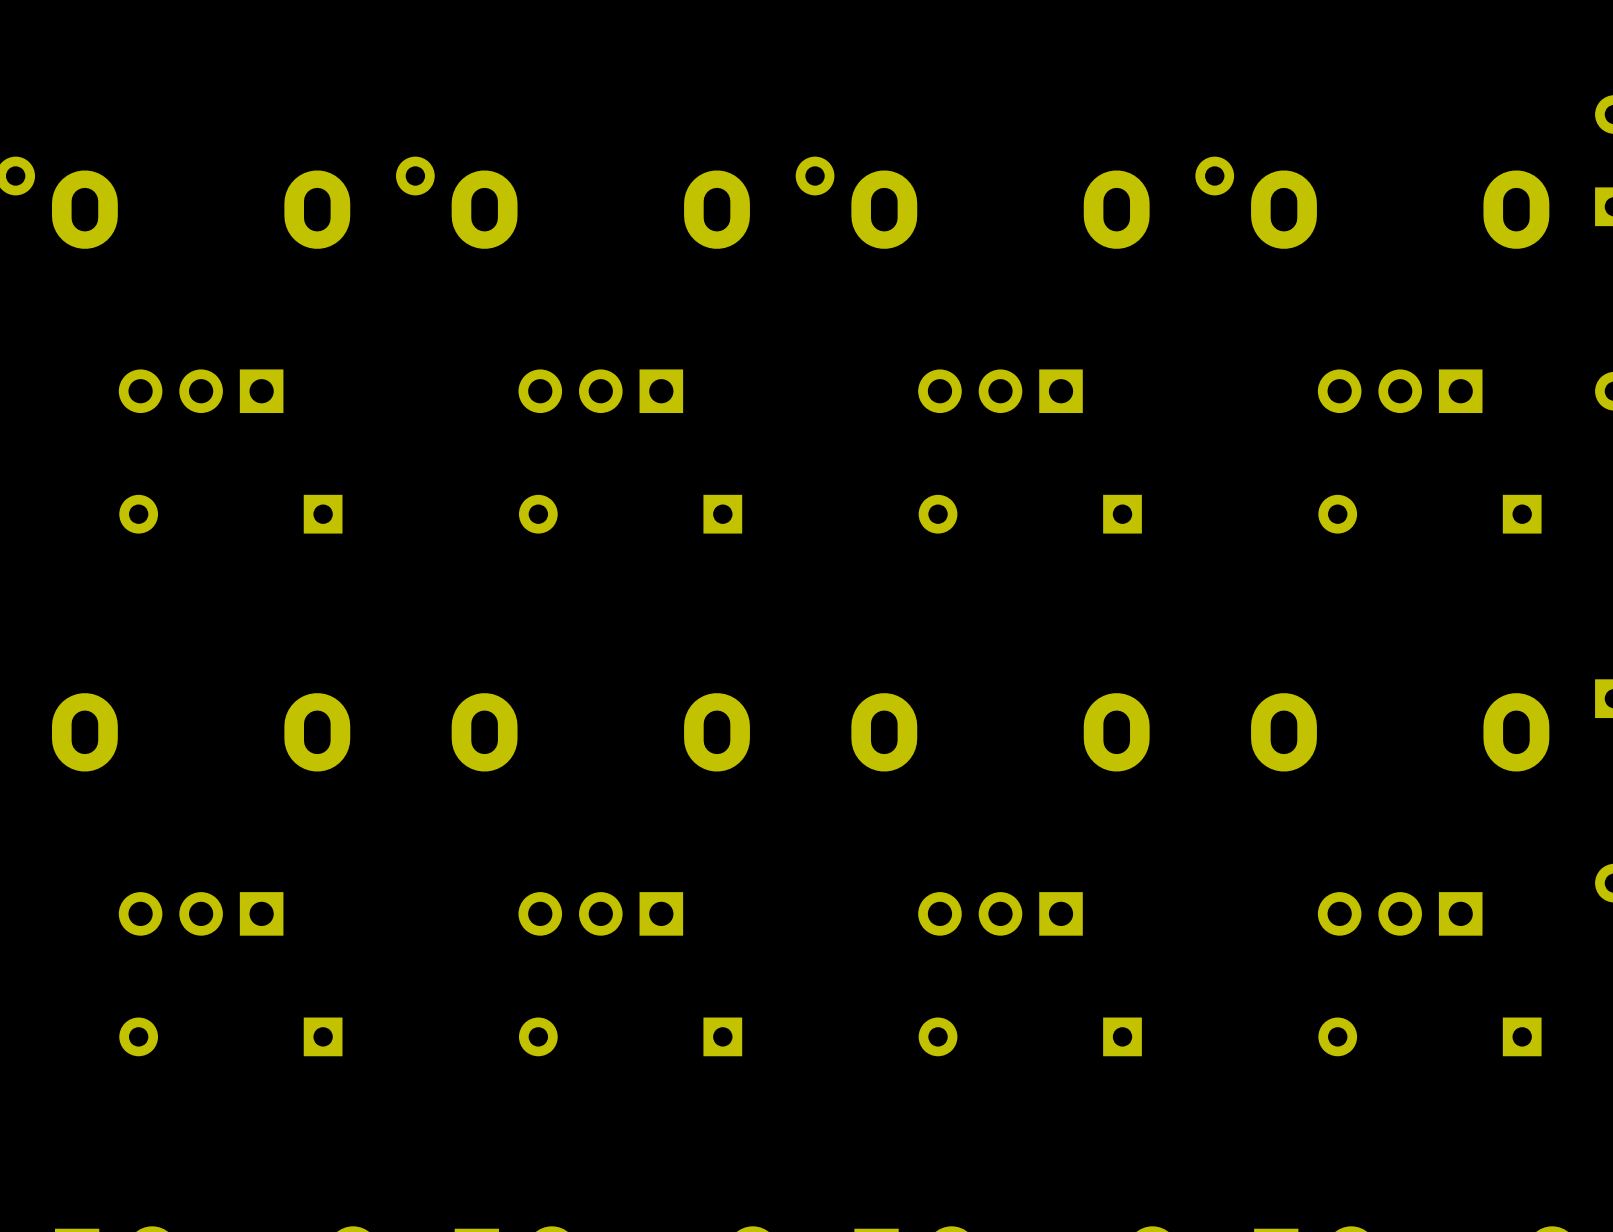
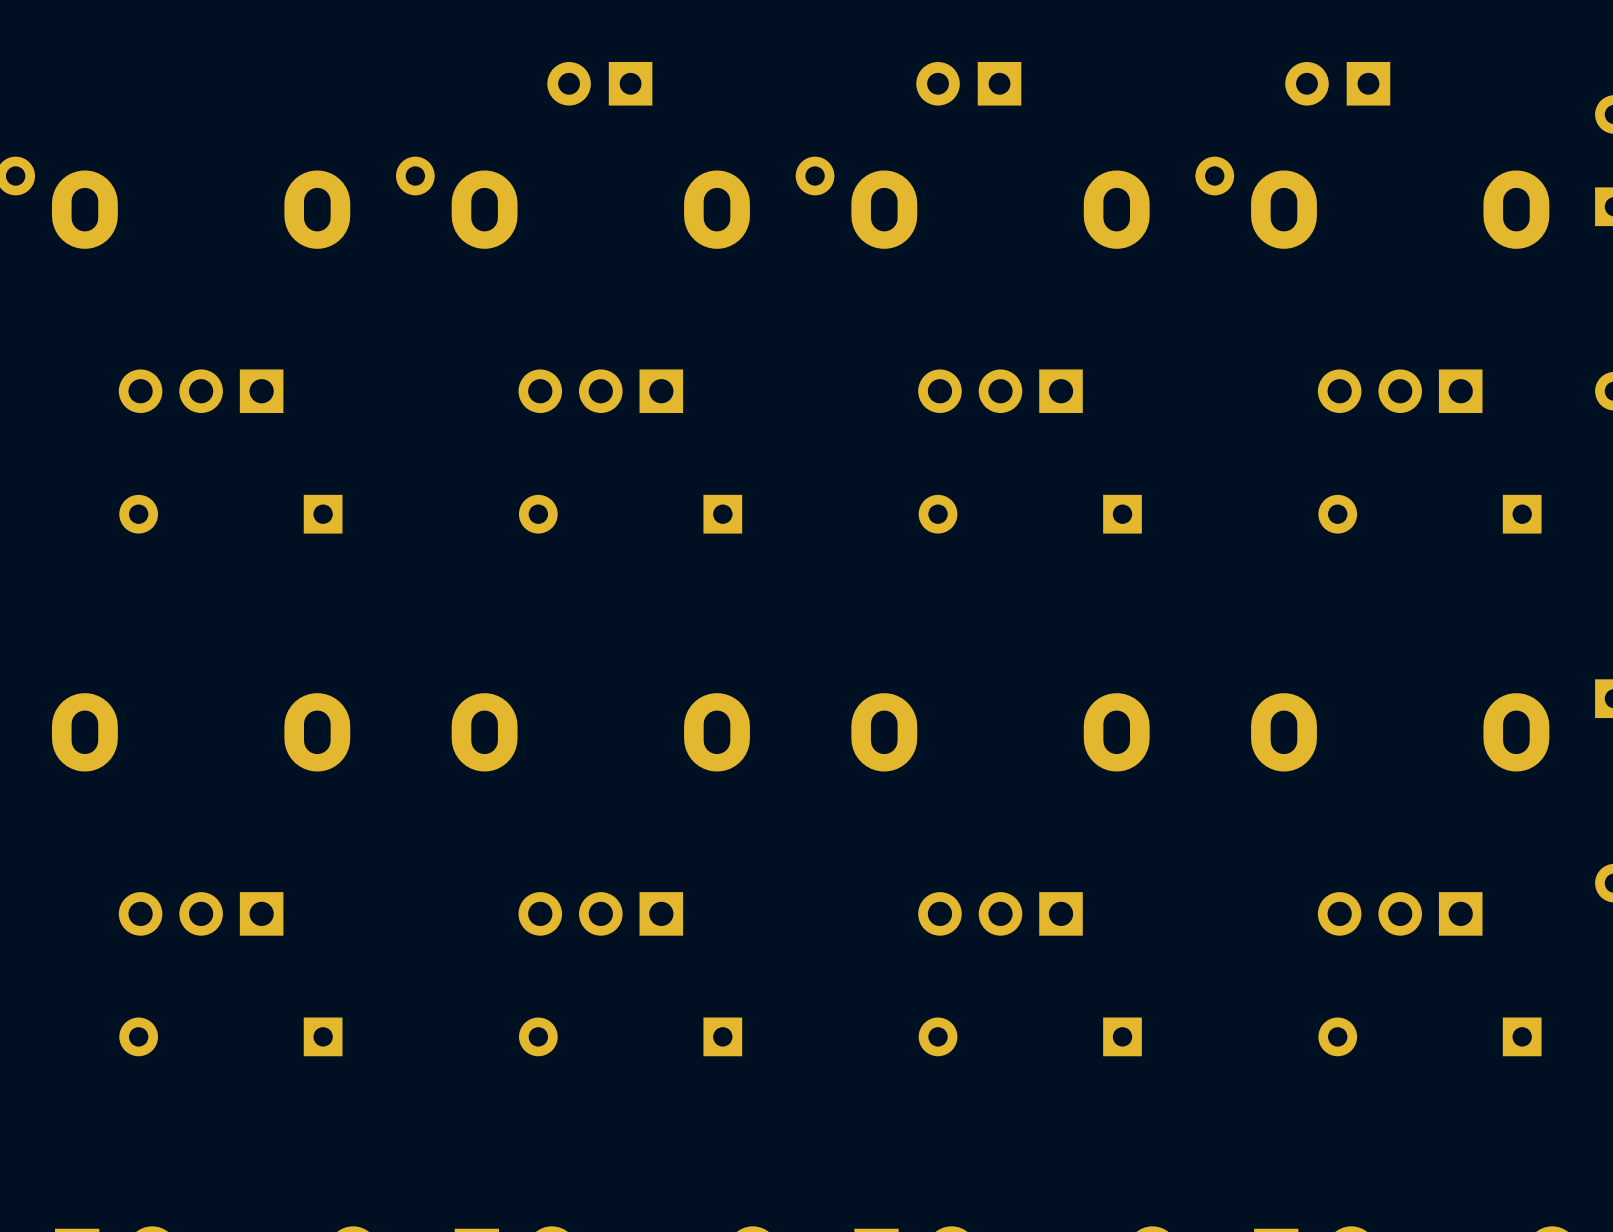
part: none -> (599, 83)
part: none -> (968, 83)
part: none -> (1337, 83)

